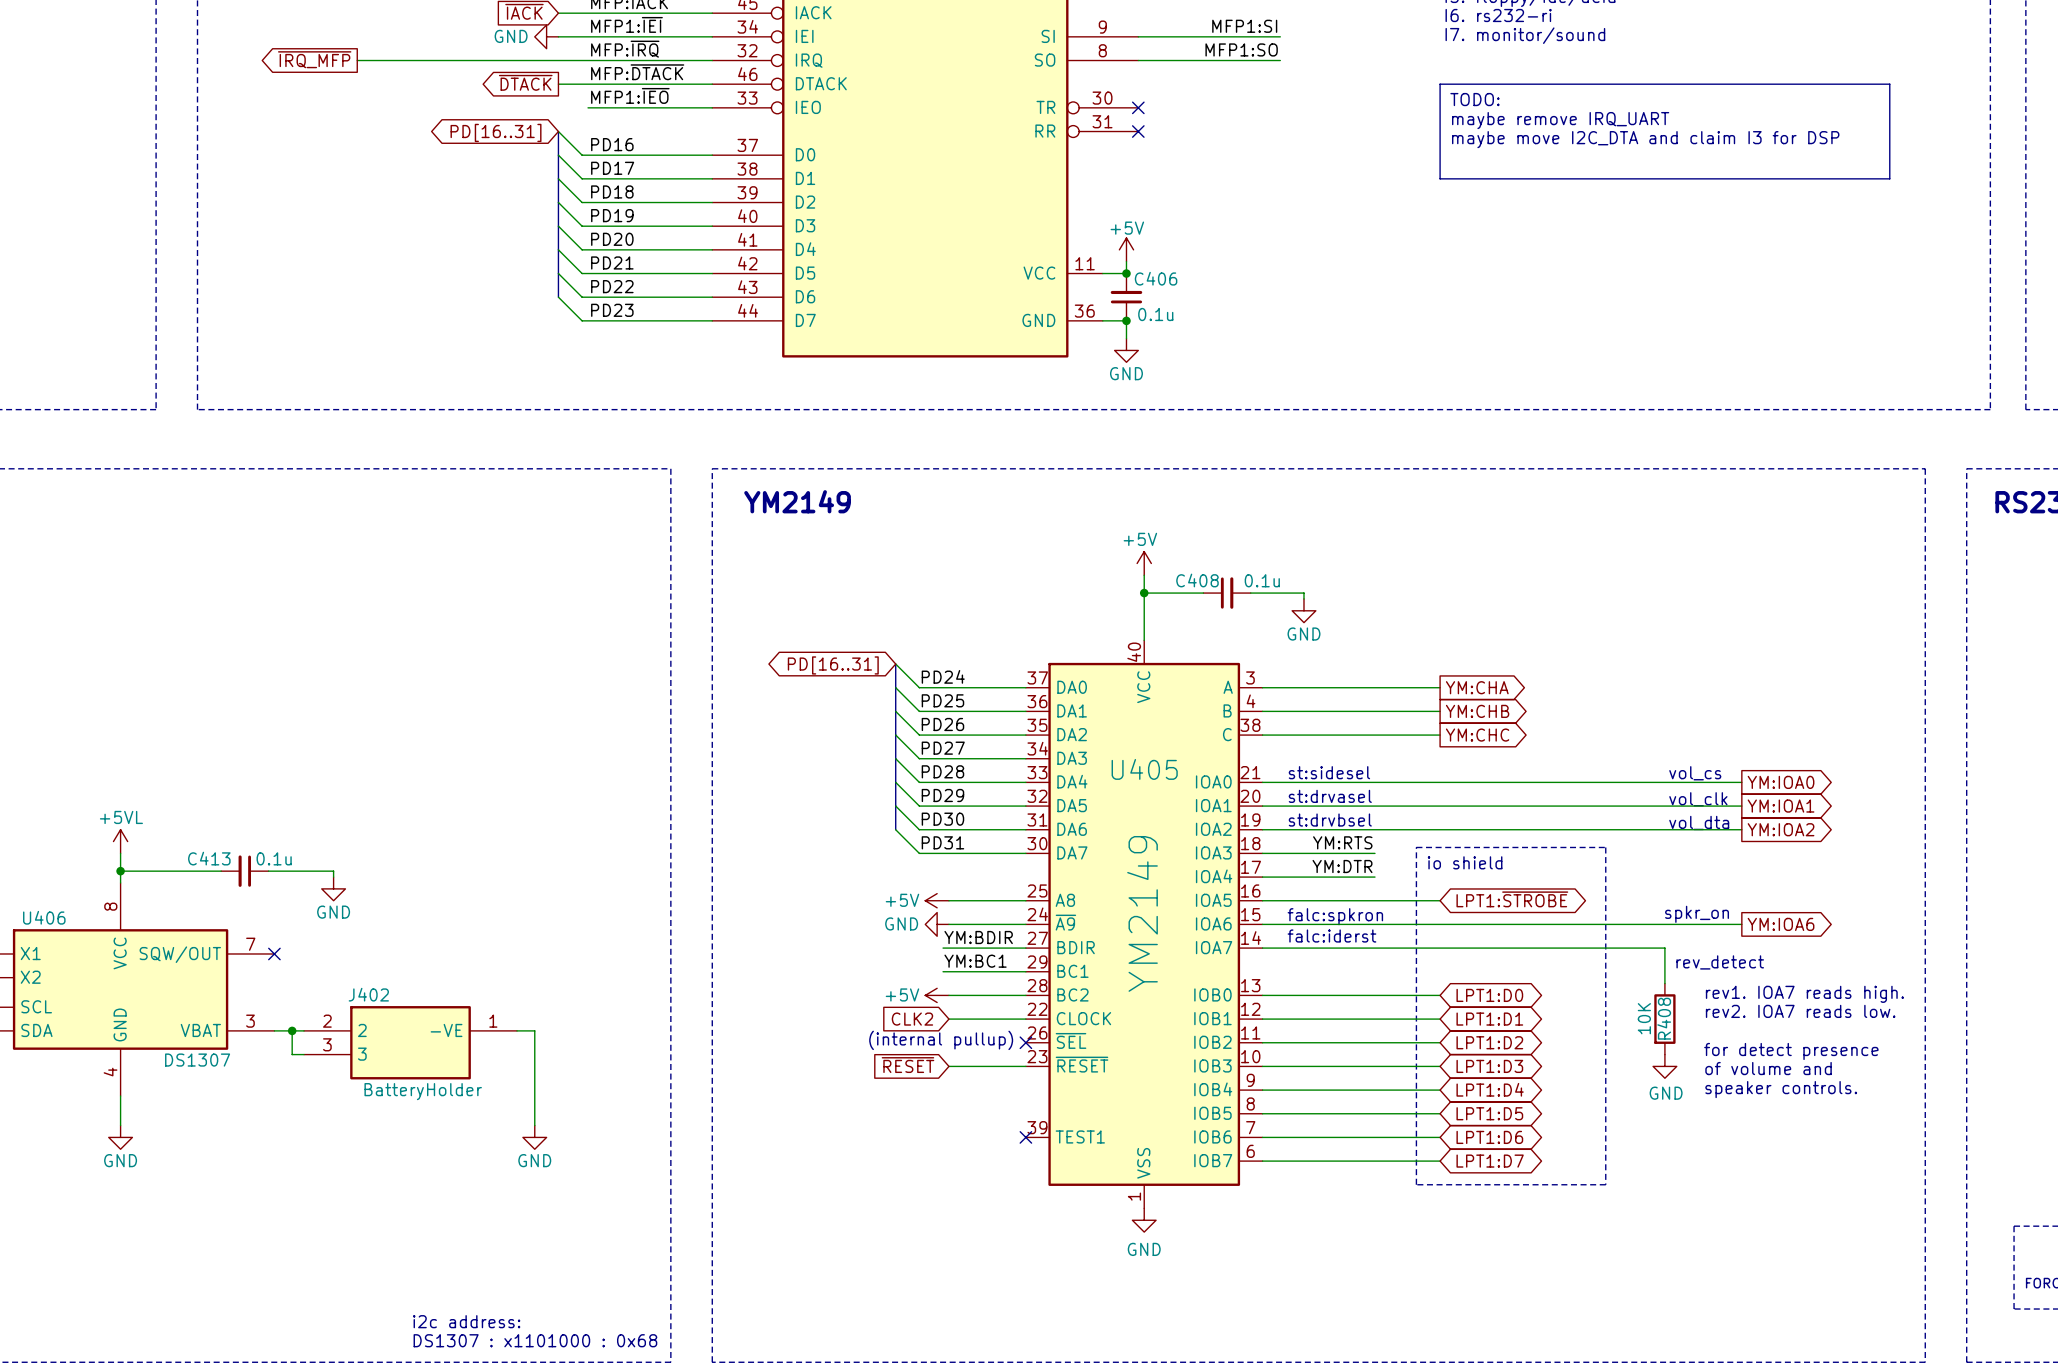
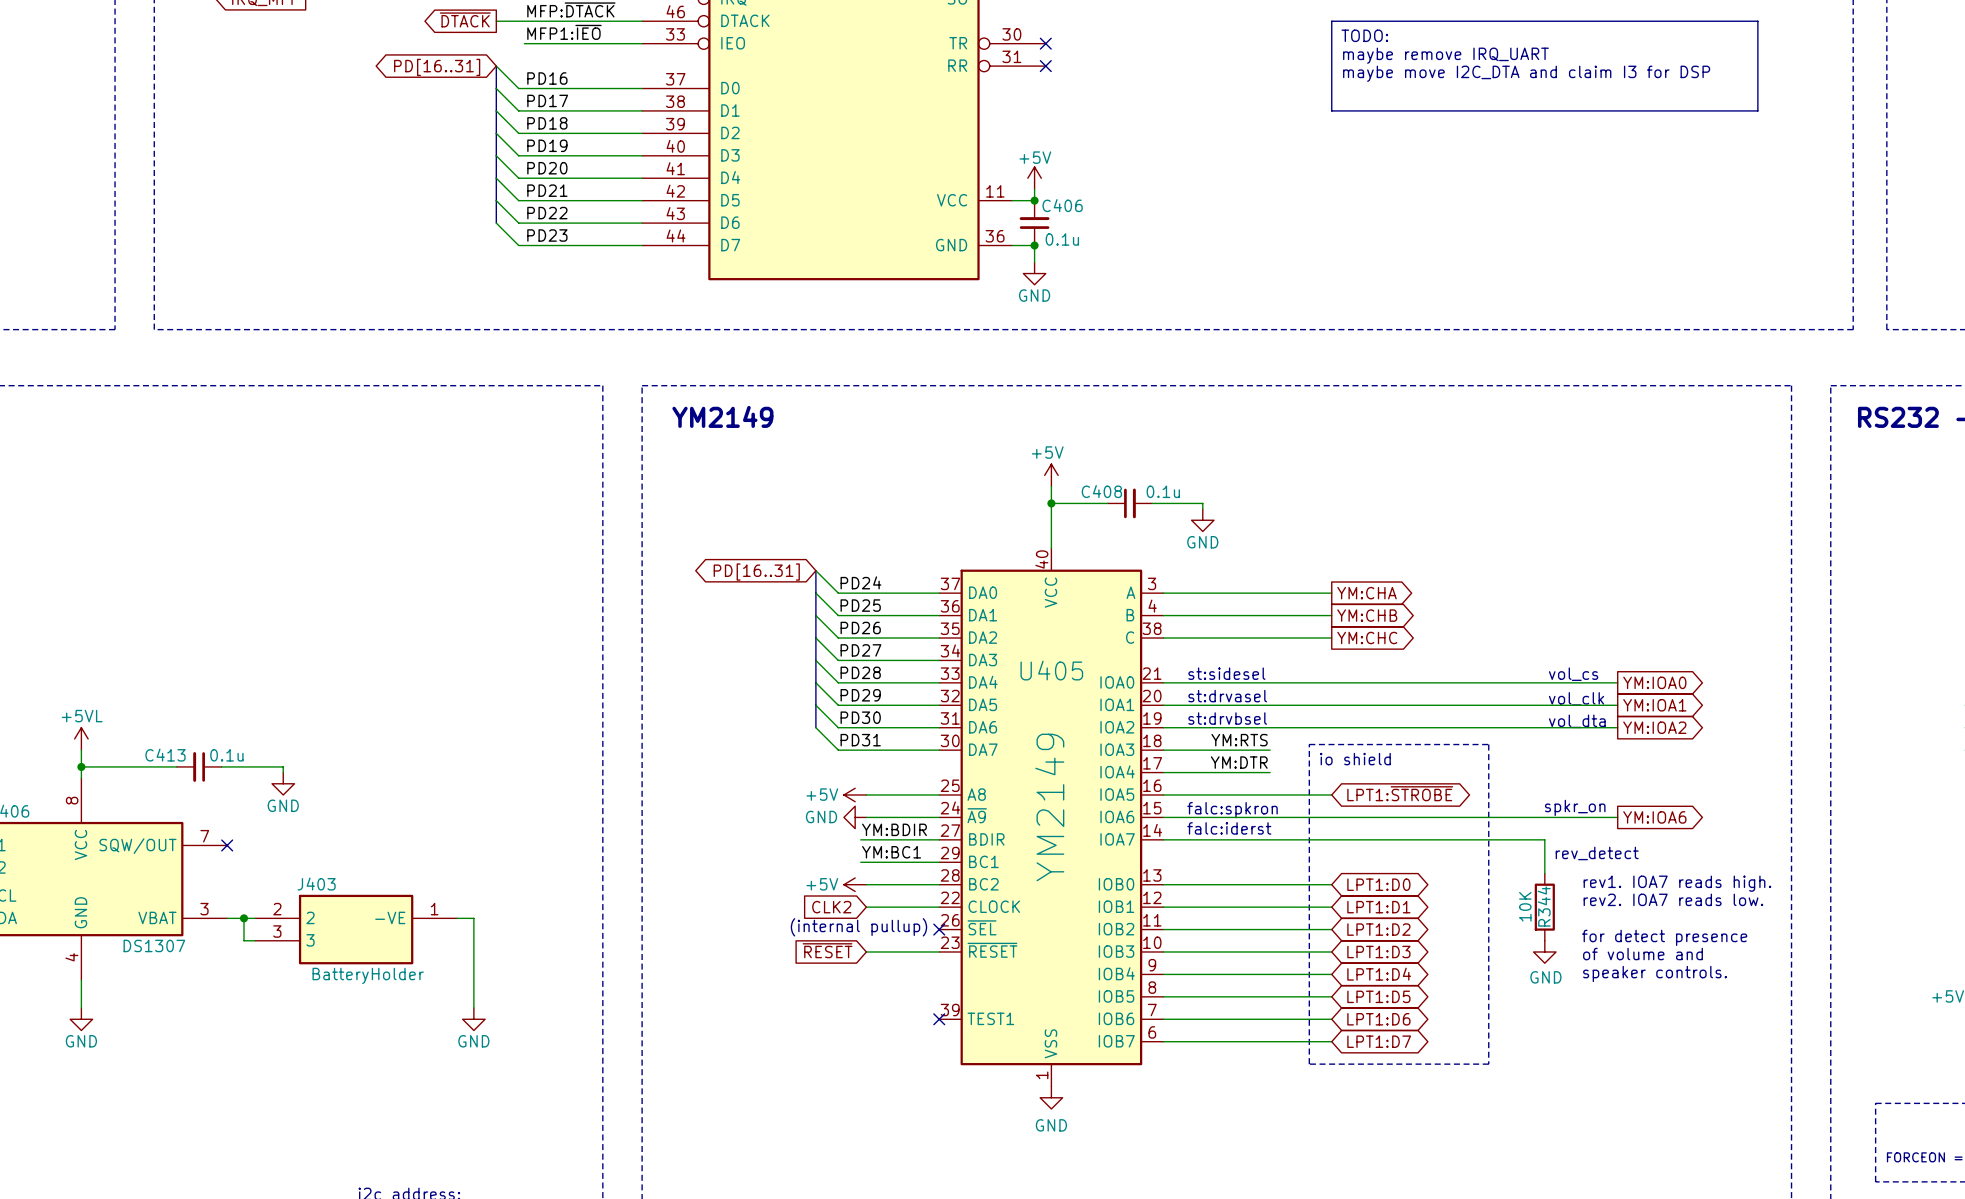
J402 name: J402 (368, 994) -> J403 (316, 884)
R408 name: R408 (1664, 1018) -> R344 (1544, 906)

